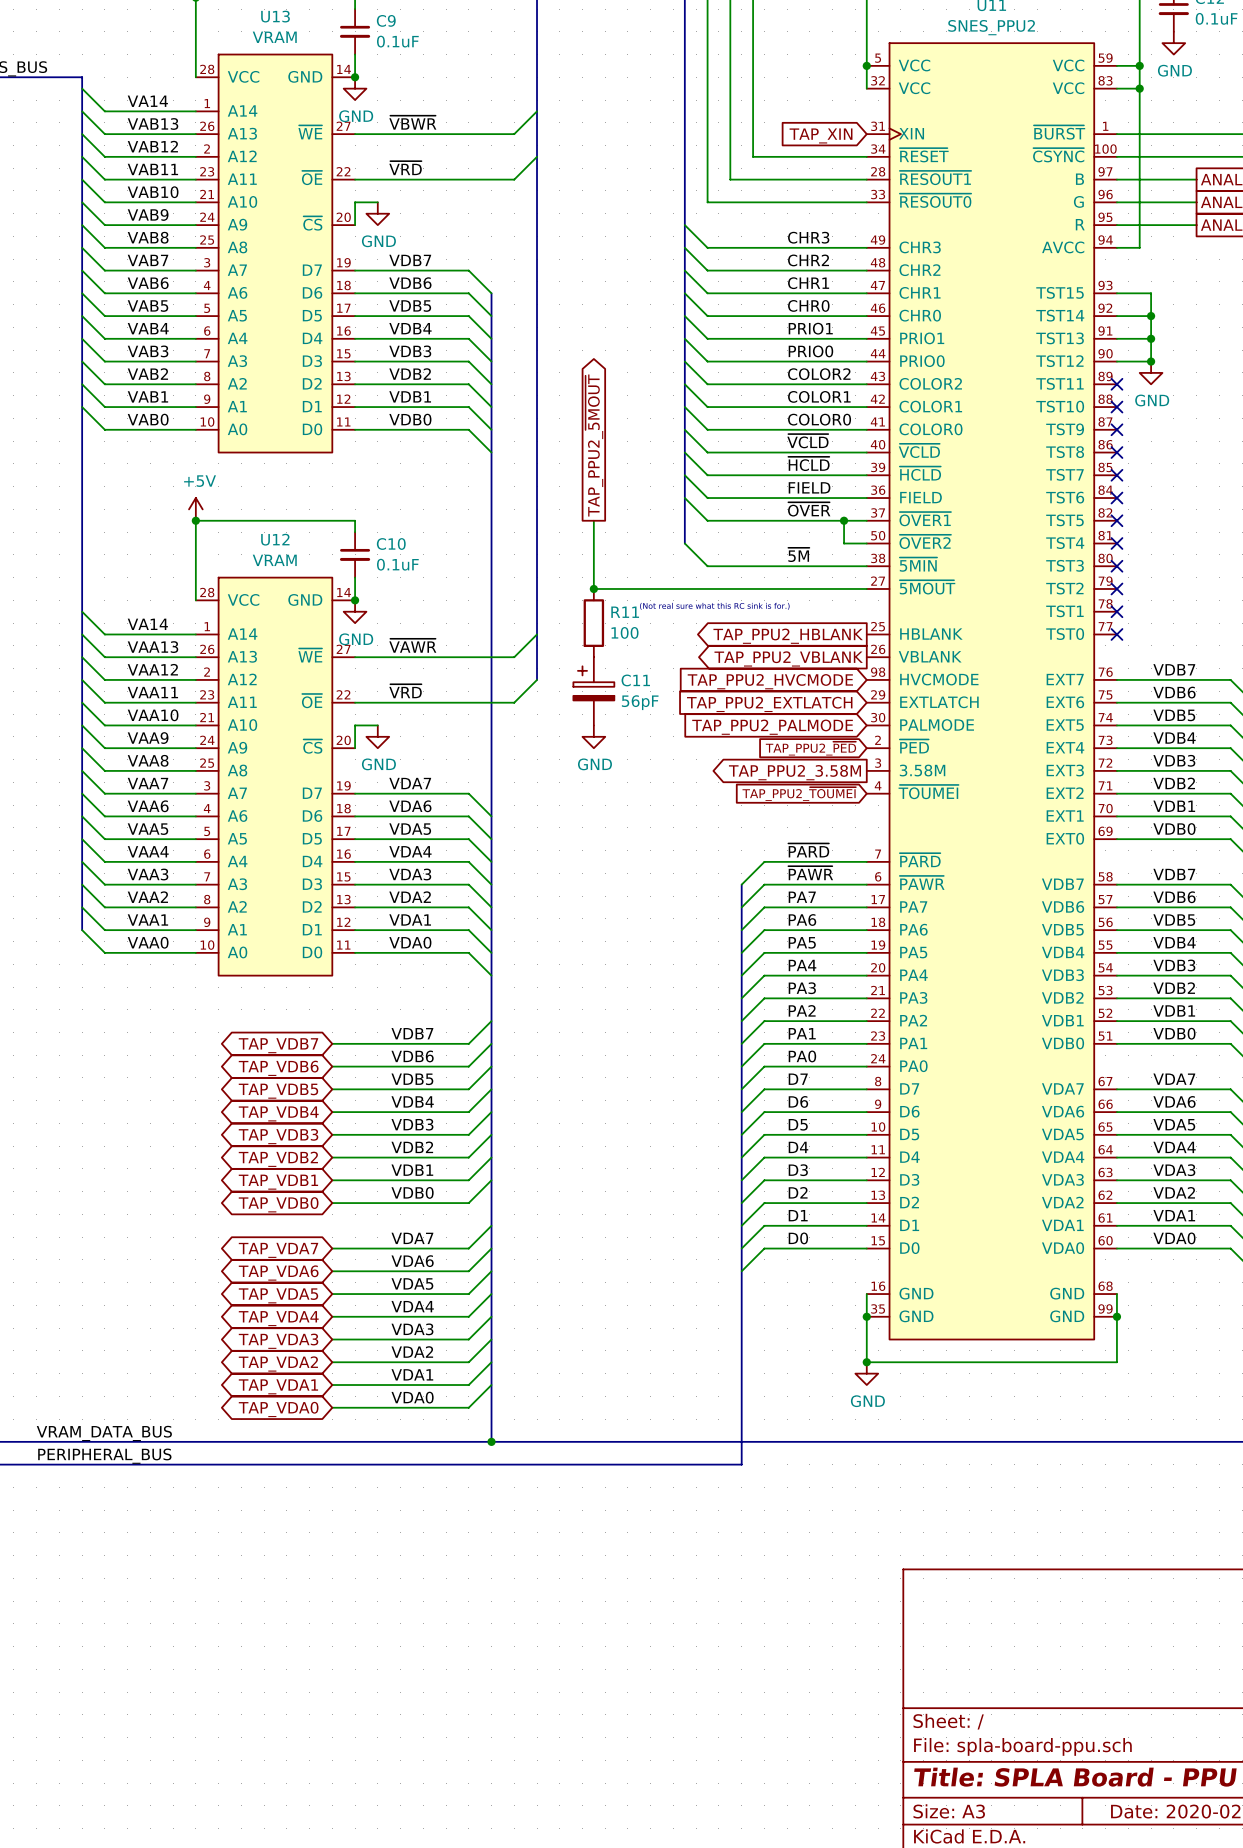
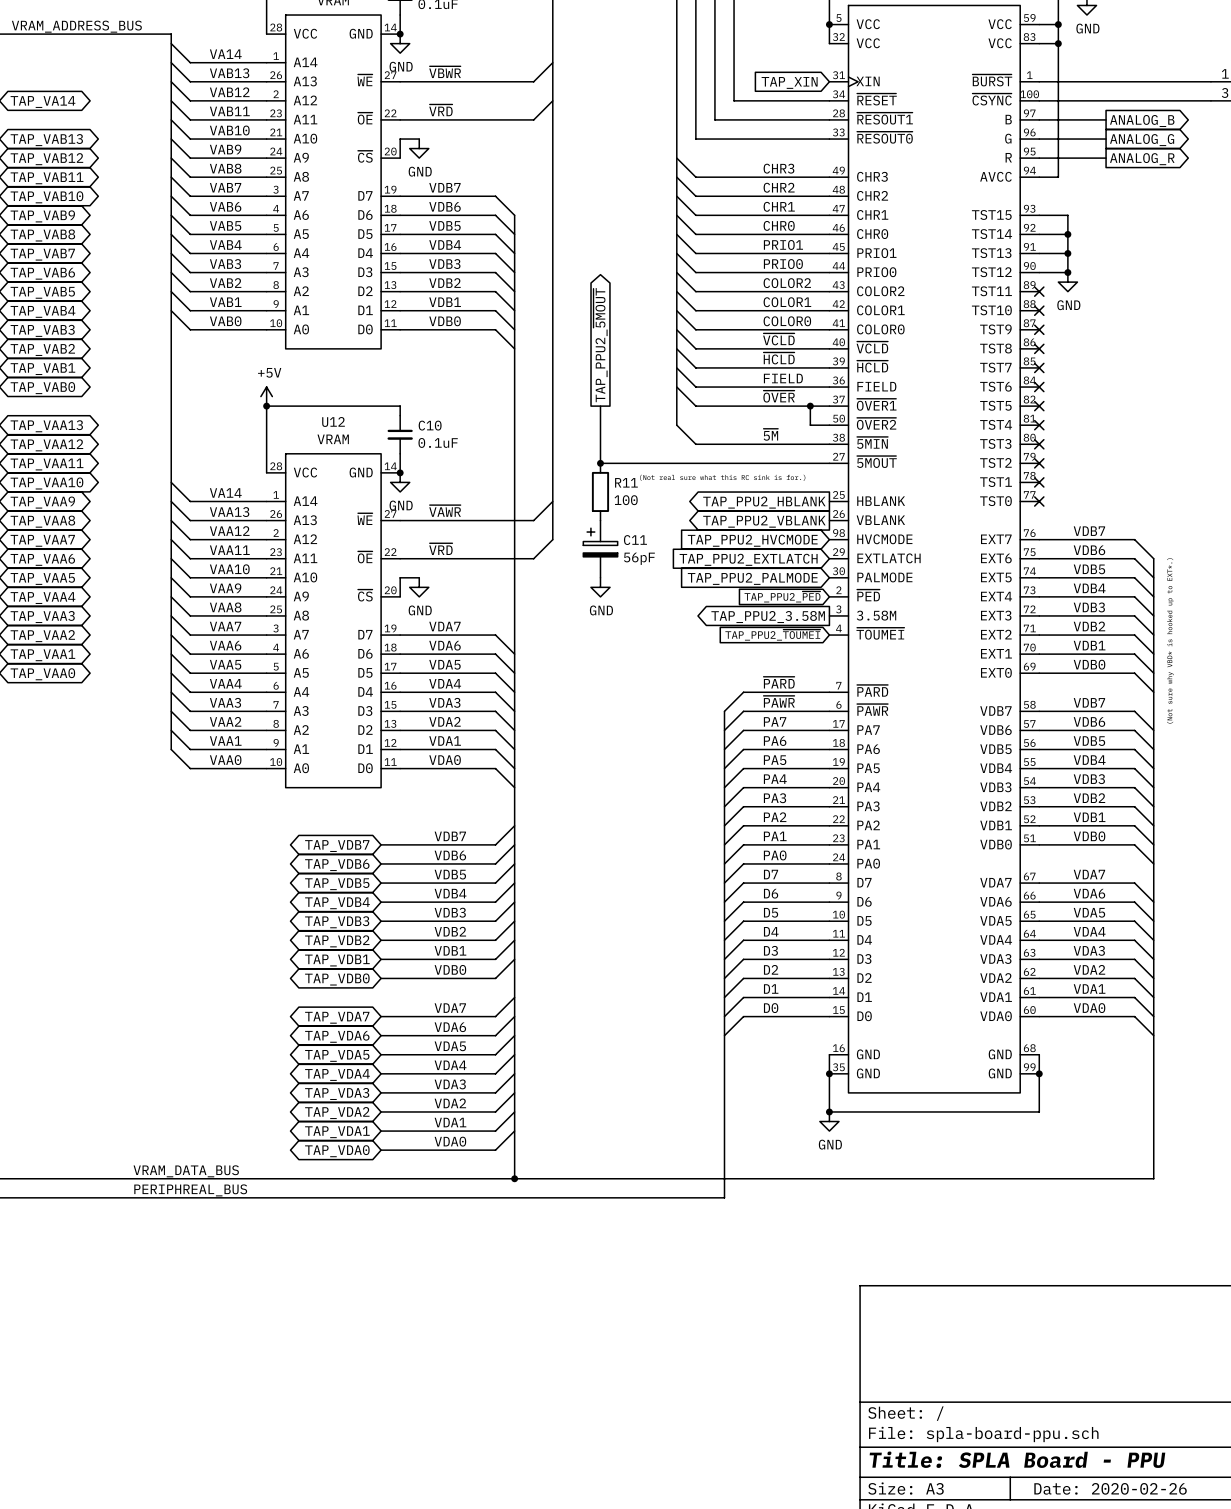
label: PERIPHERAL_BUS (104, 1456) -> PERIPHREAL_BUS (190, 1190)

